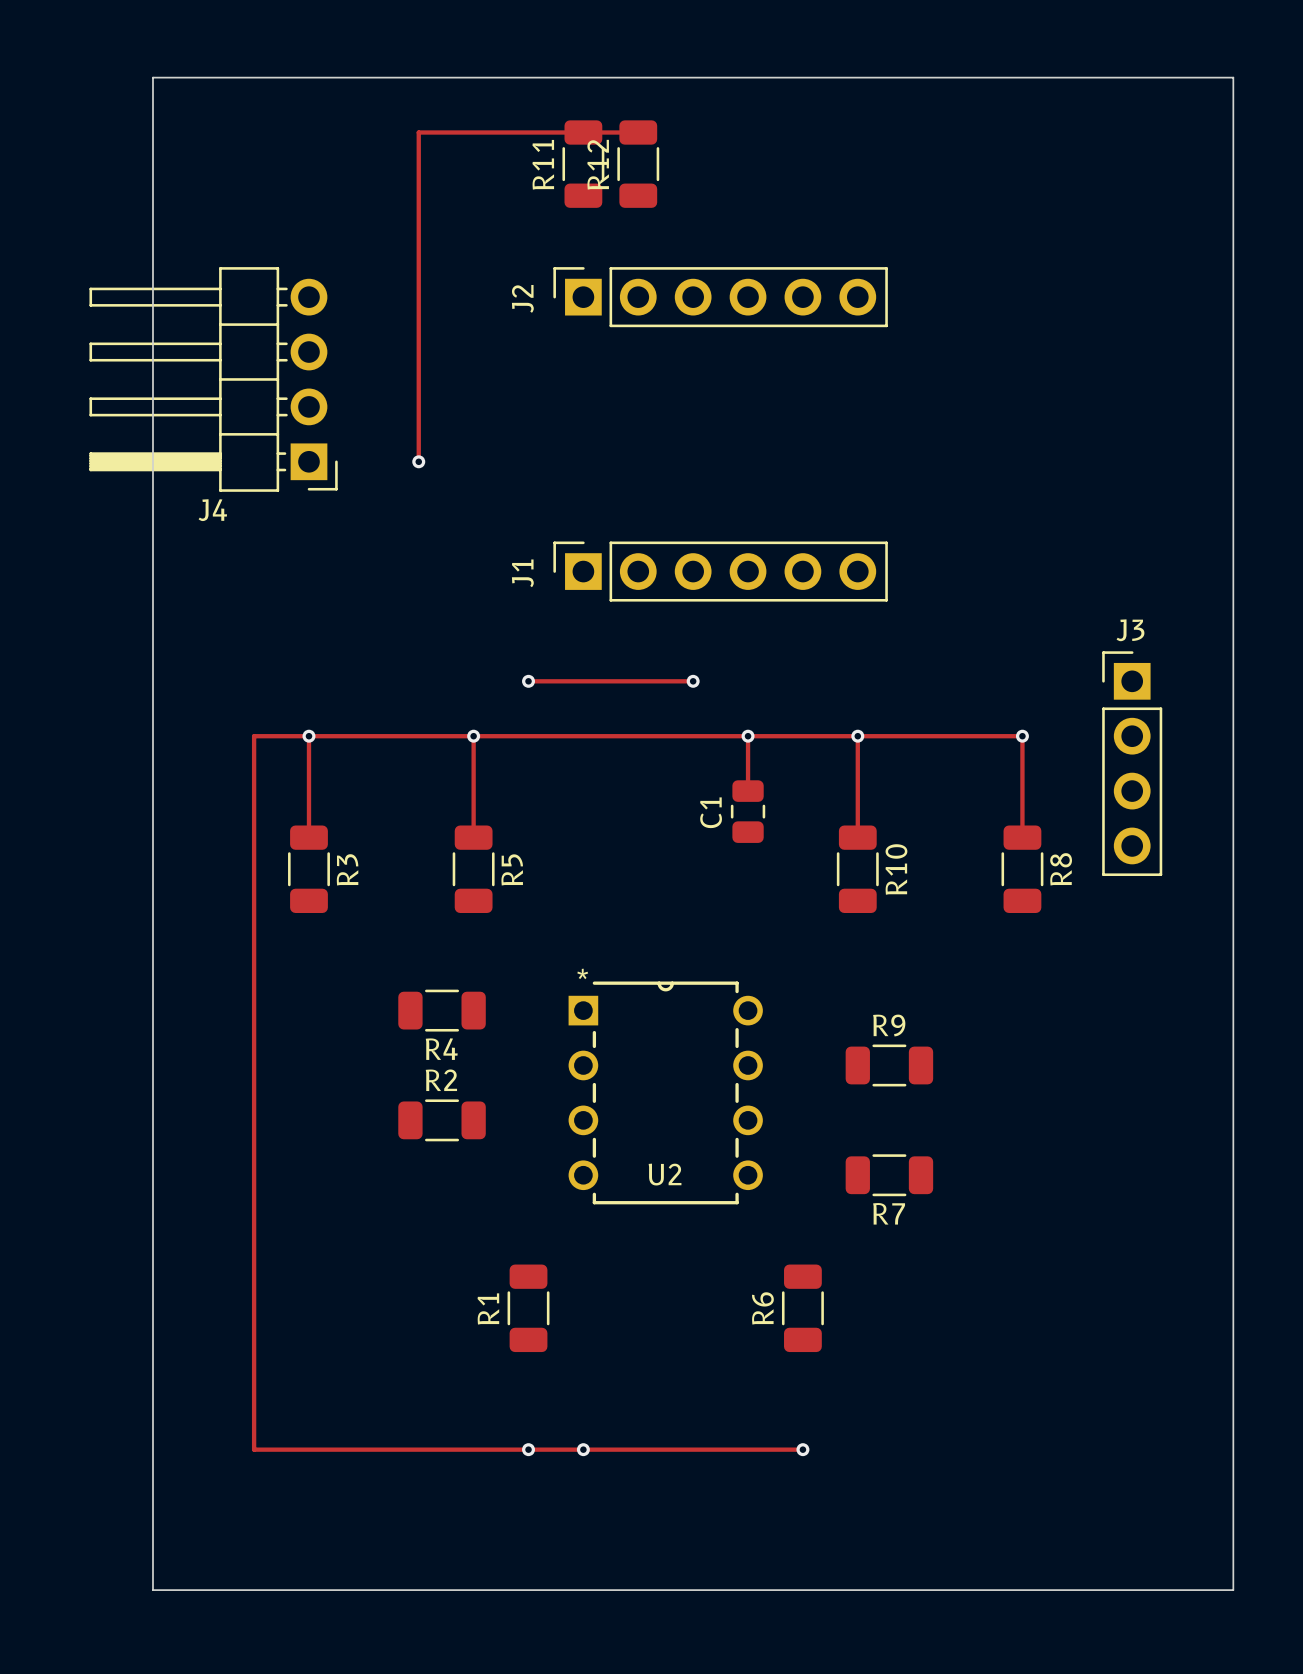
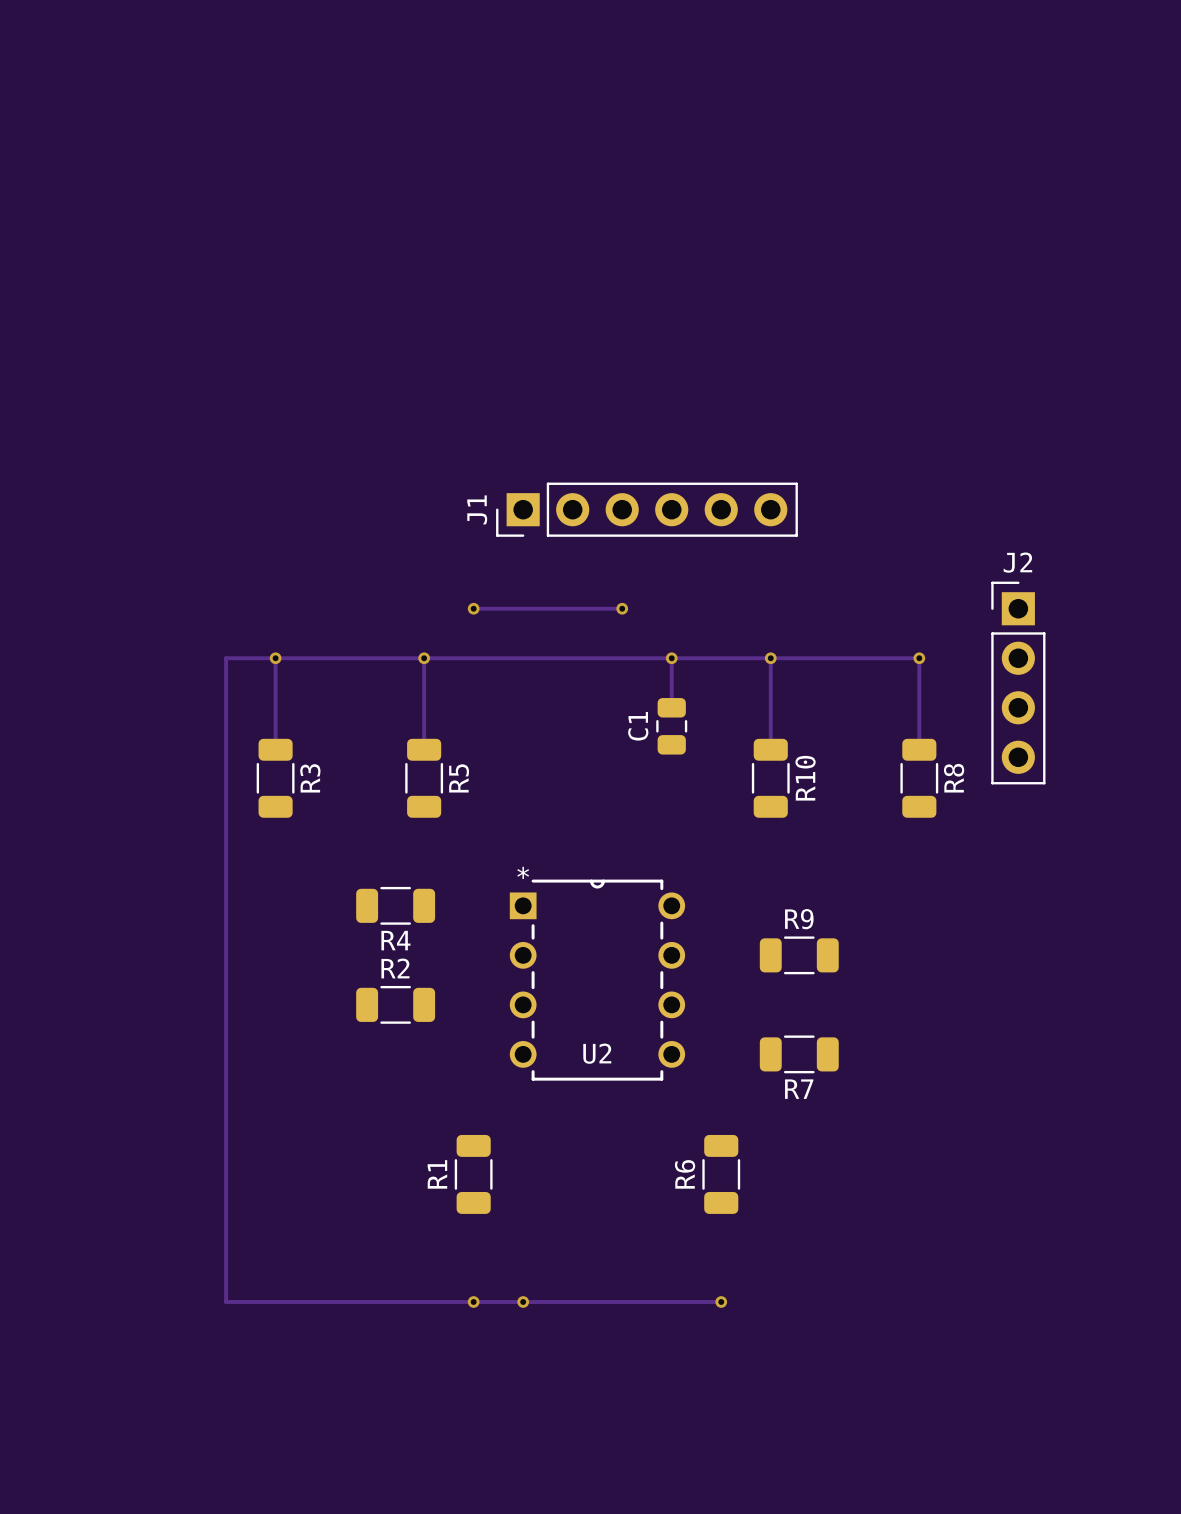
board edge: (152, 77) (1233, 77) (1233, 1590) (152, 1590) (152, 77) -> none
track: (638, 132) (418, 132) (418, 461) -> none
R11: (583, 164) -> none
R12: (638, 164) -> none
J2: (720, 297) -> none
J4: (213, 379) -> none
via: (418, 461) -> none
J1 footprint: [553, 541, 888, 602] -> [496, 482, 798, 537]
J3 name: J3 (1130, 630) -> J2 (1017, 562)

